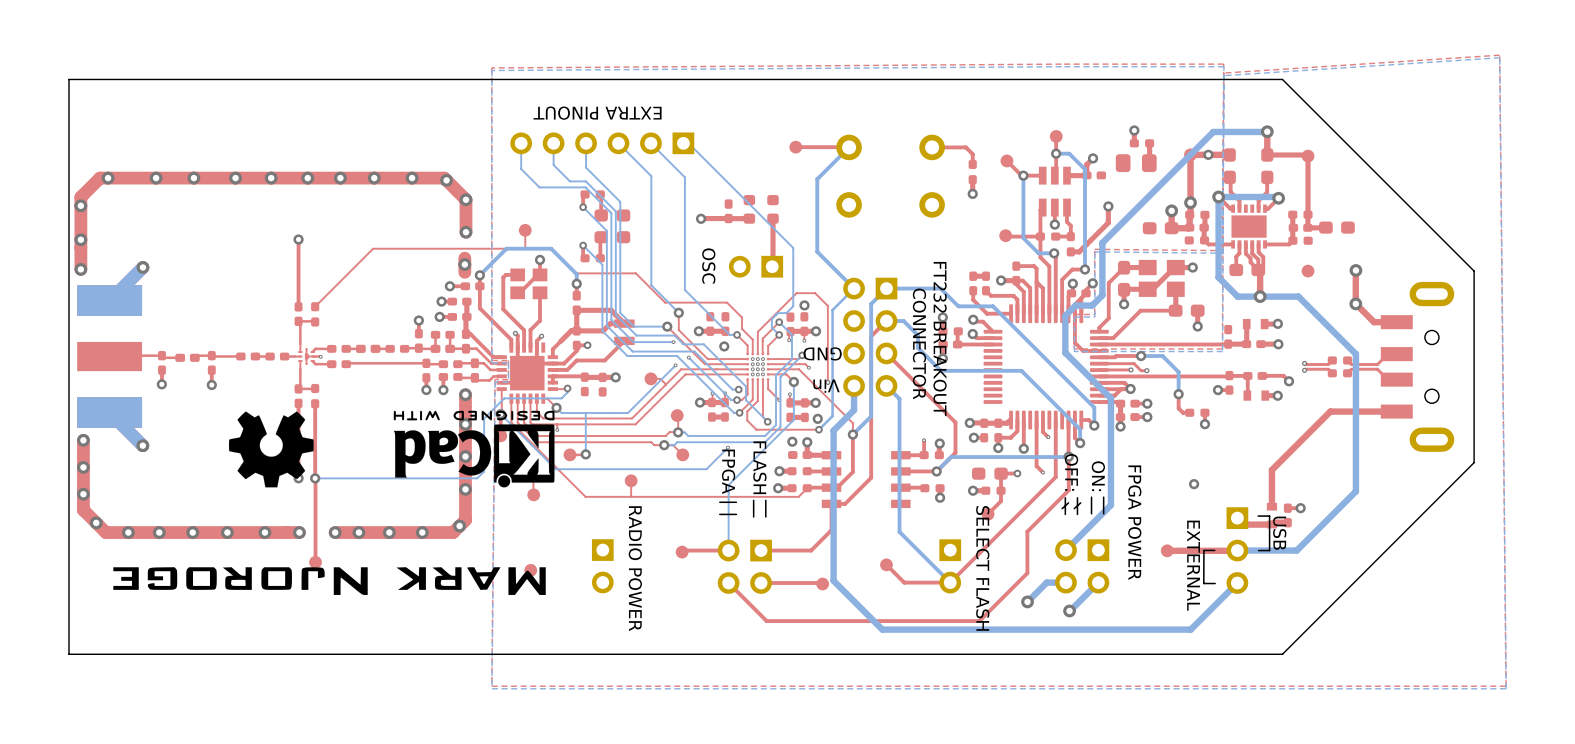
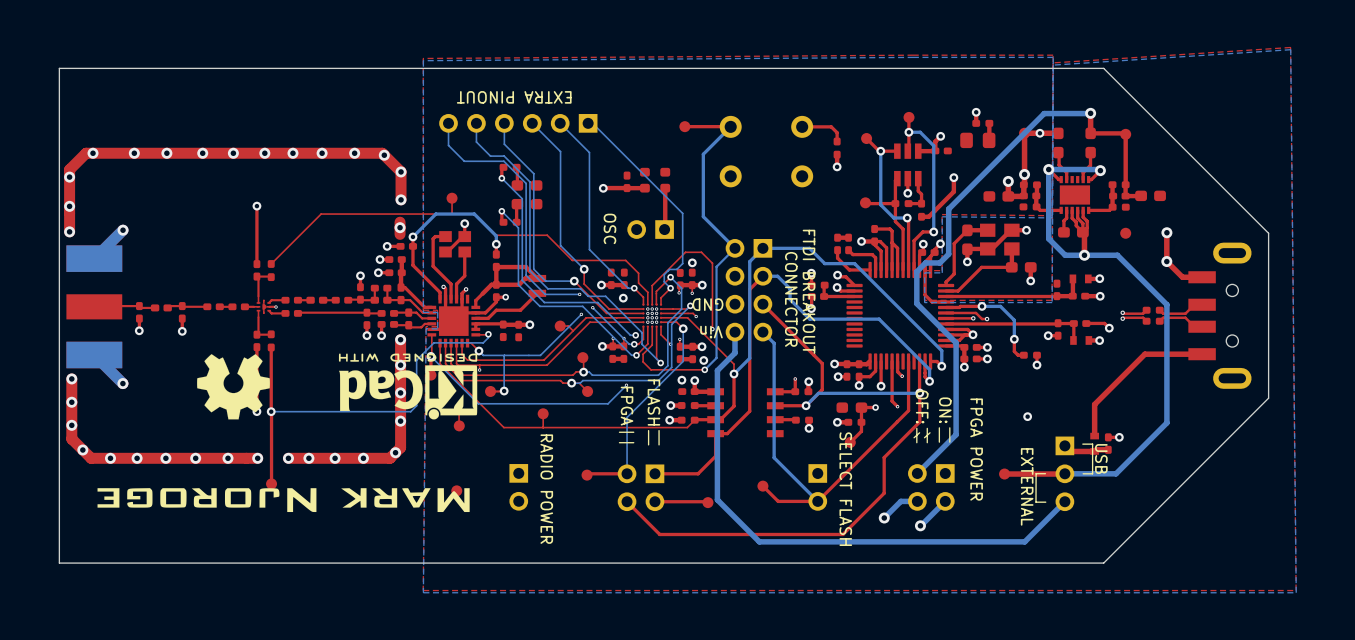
text: FT232 BREAKOUT (940, 339) -> FTDI BREAKOUT (809, 291)

